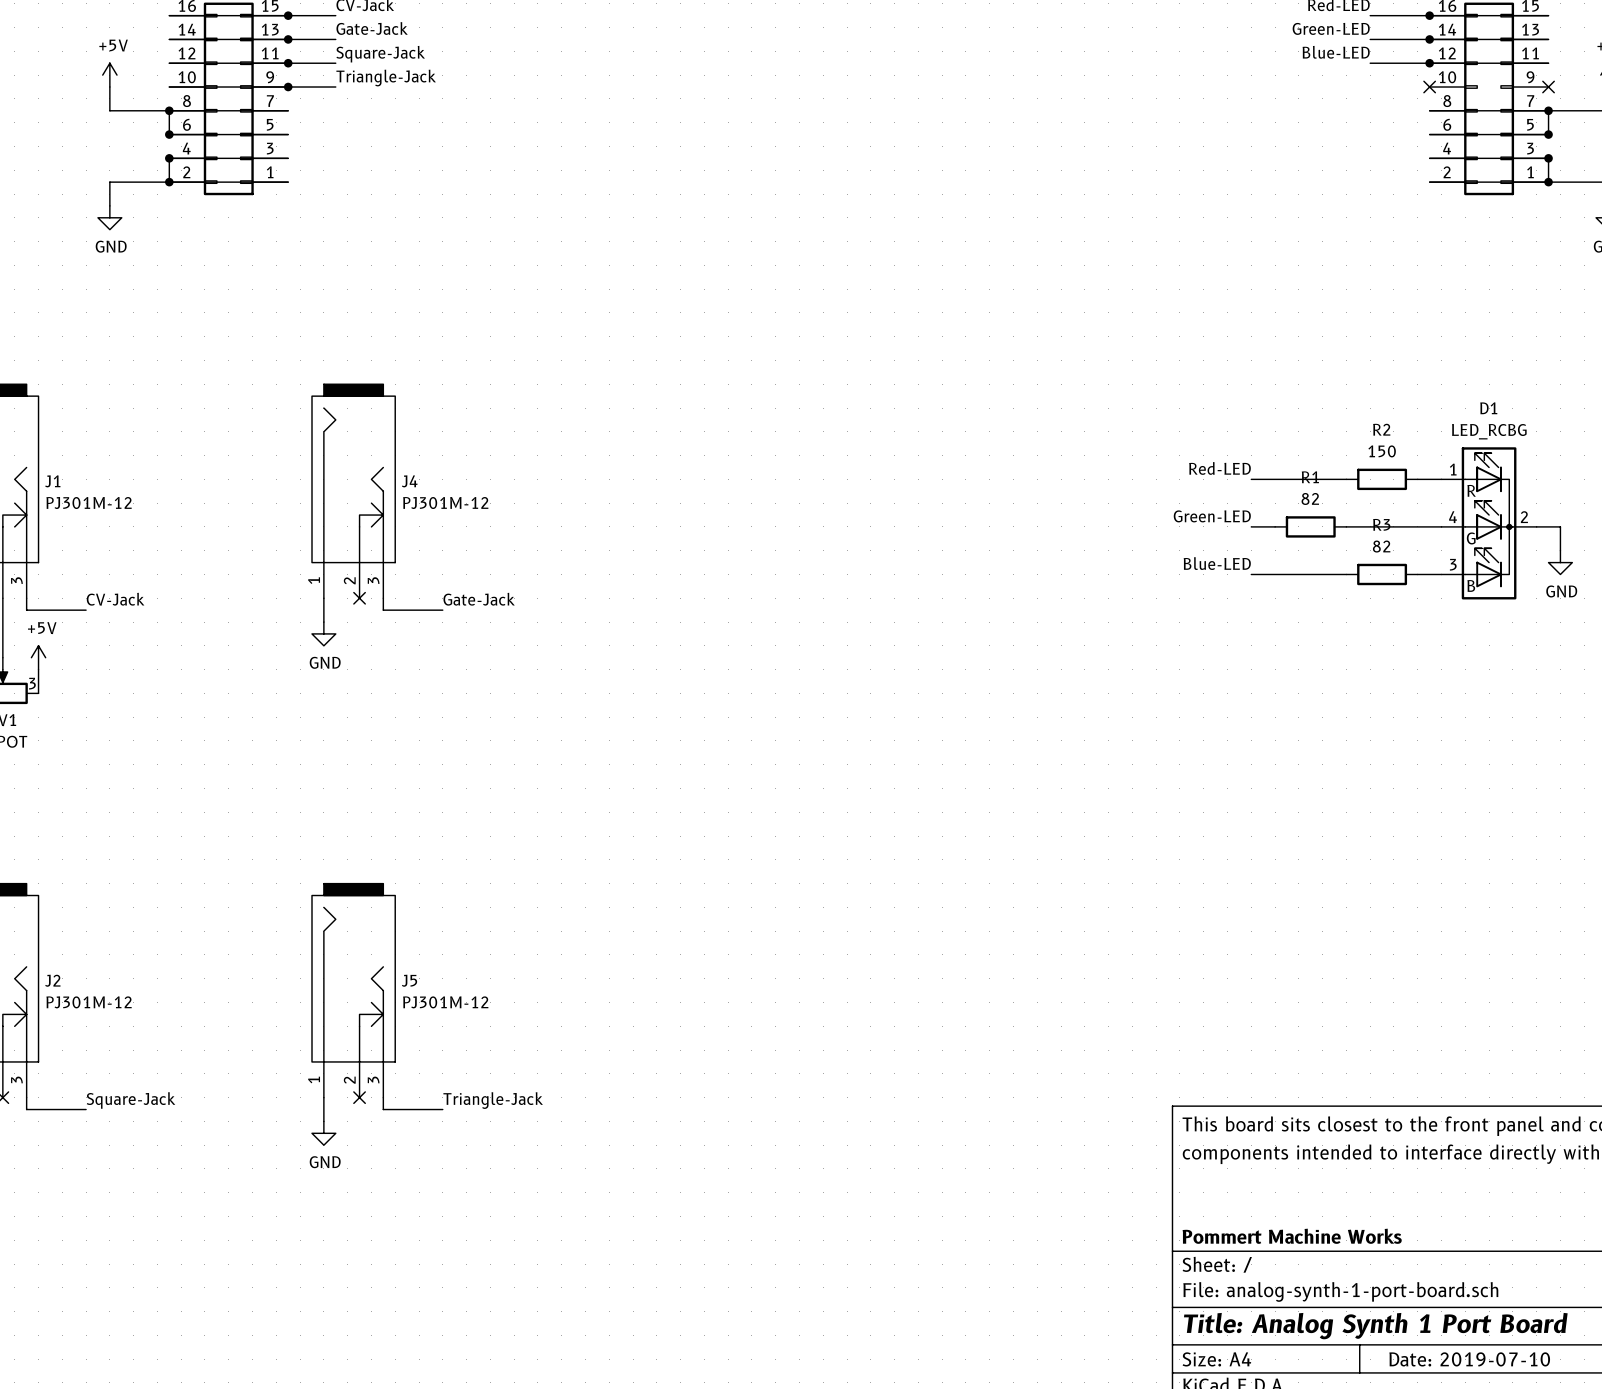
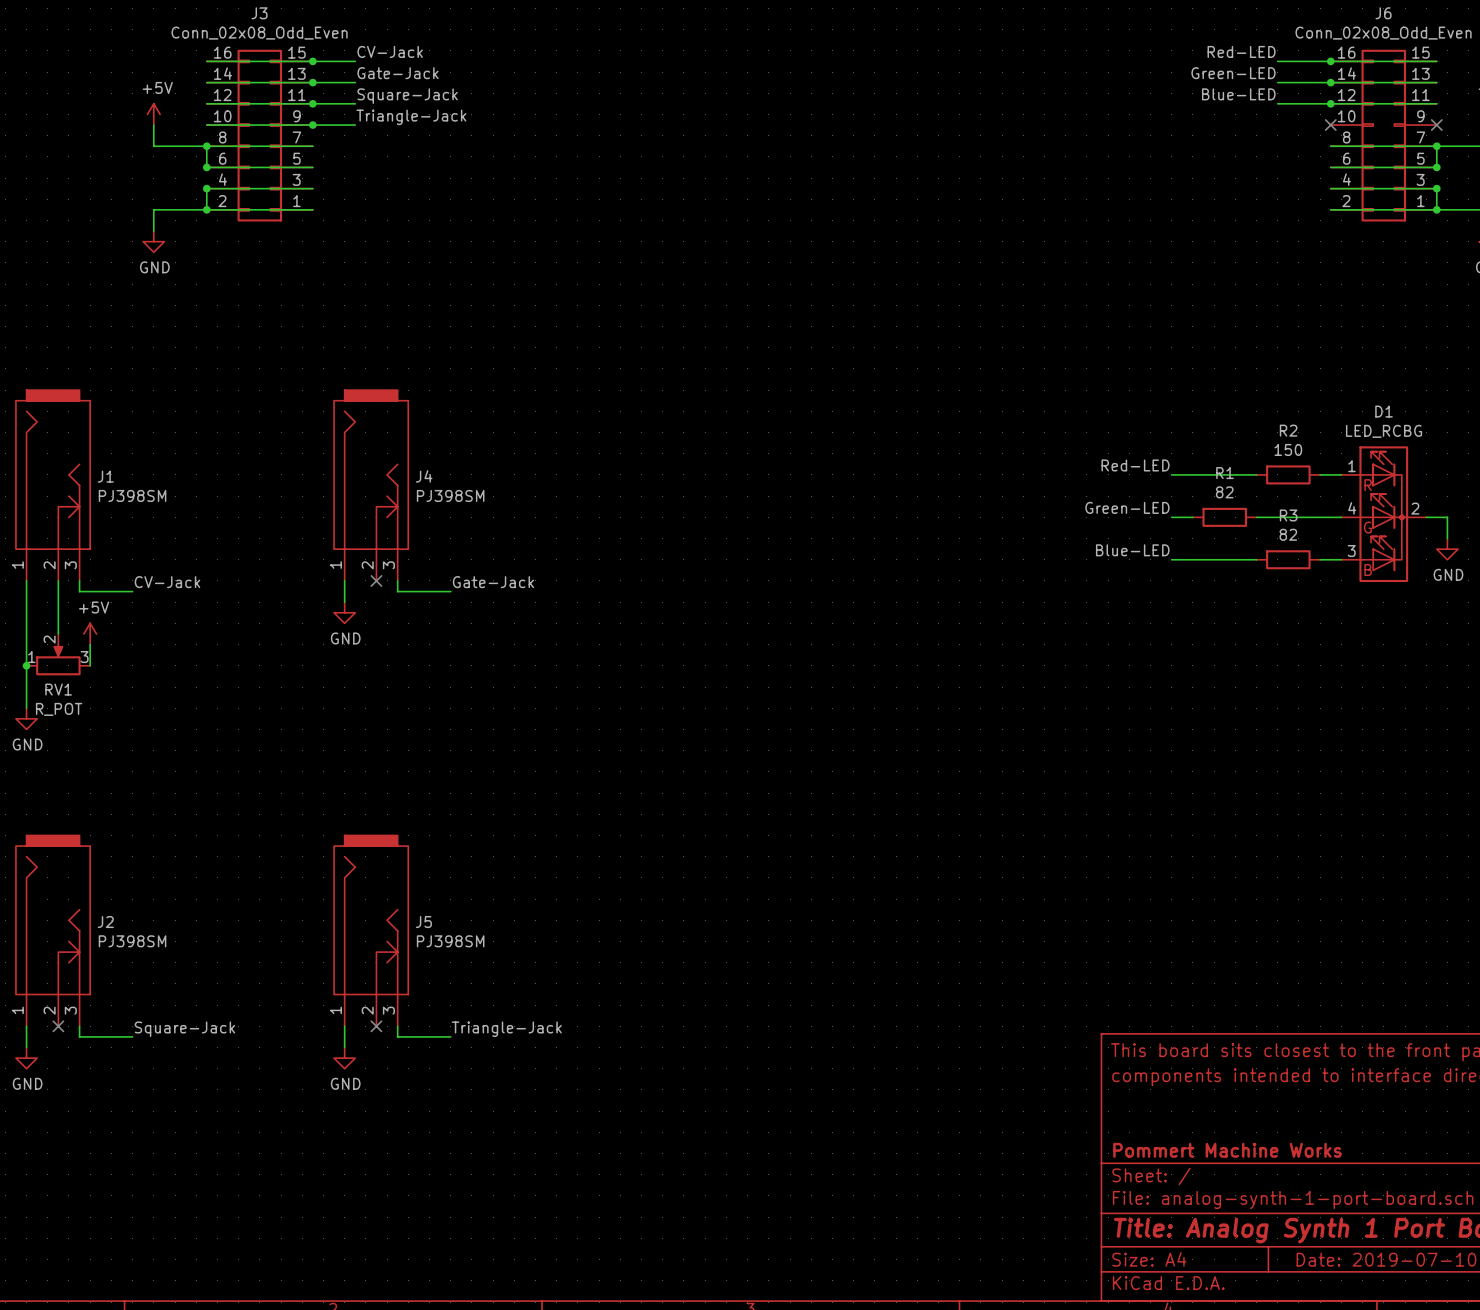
J1 value: PJ301M-12 (89, 503) -> PJ398SM (132, 495)
J4 value: PJ301M-12 (445, 503) -> PJ398SM (450, 495)
J2 value: PJ301M-12 (89, 1002) -> PJ398SM (132, 941)
J5 value: PJ301M-12 (445, 1002) -> PJ398SM (450, 941)

